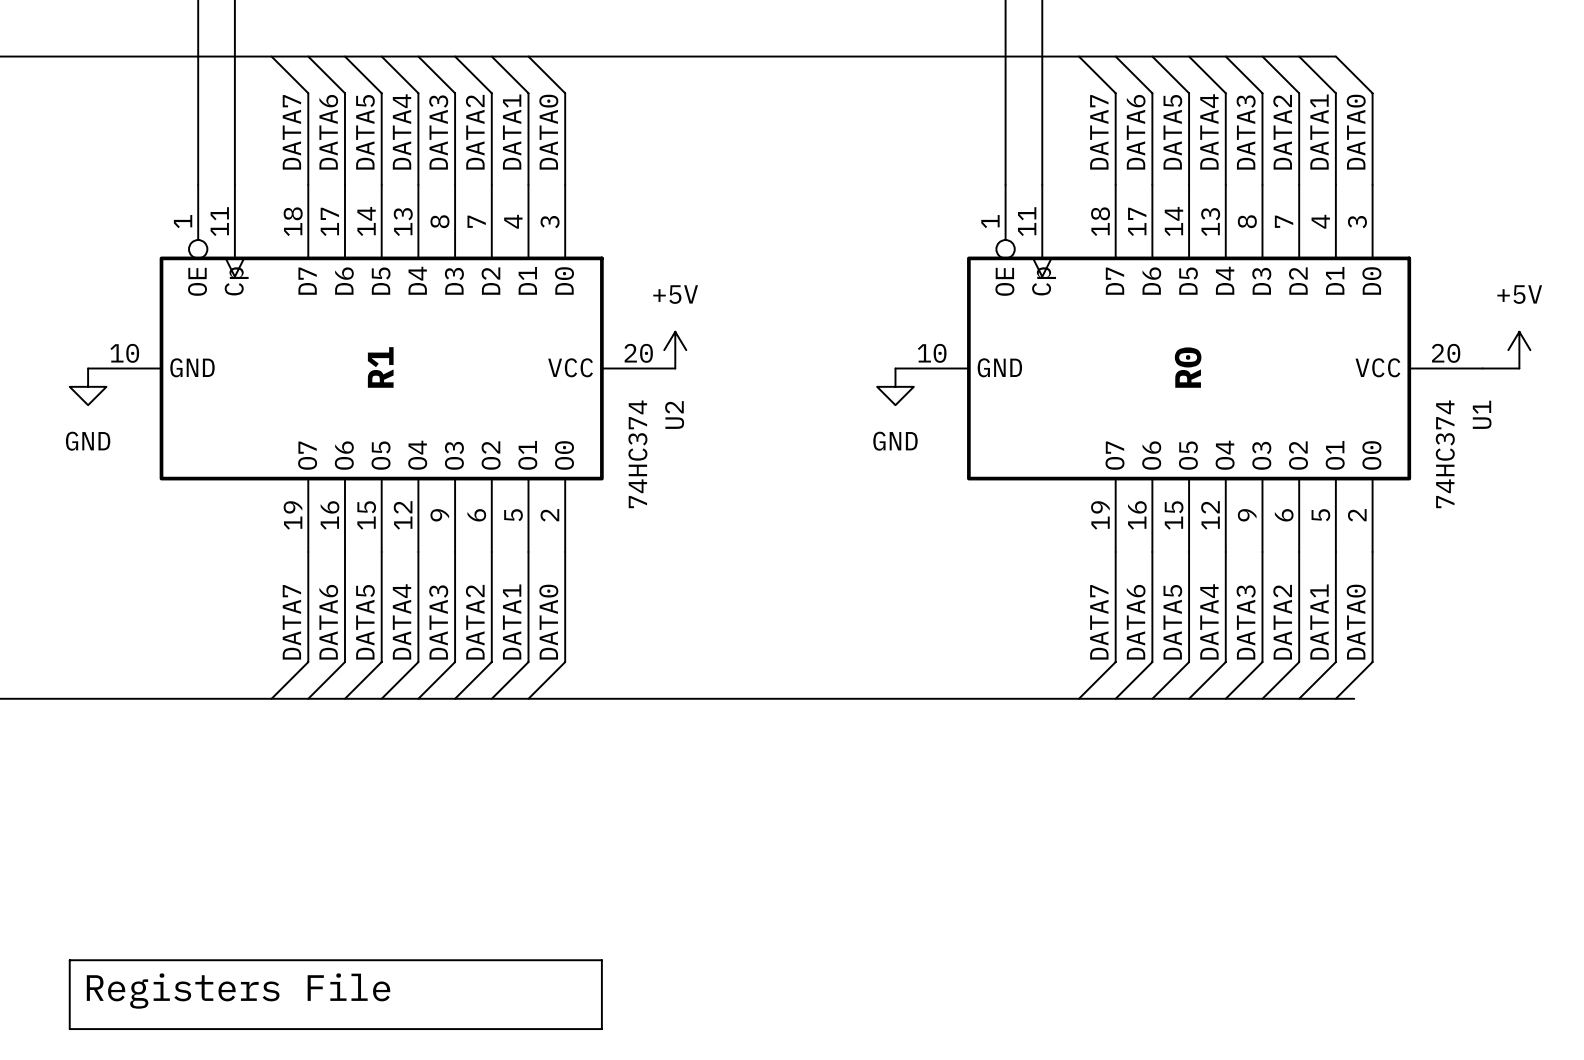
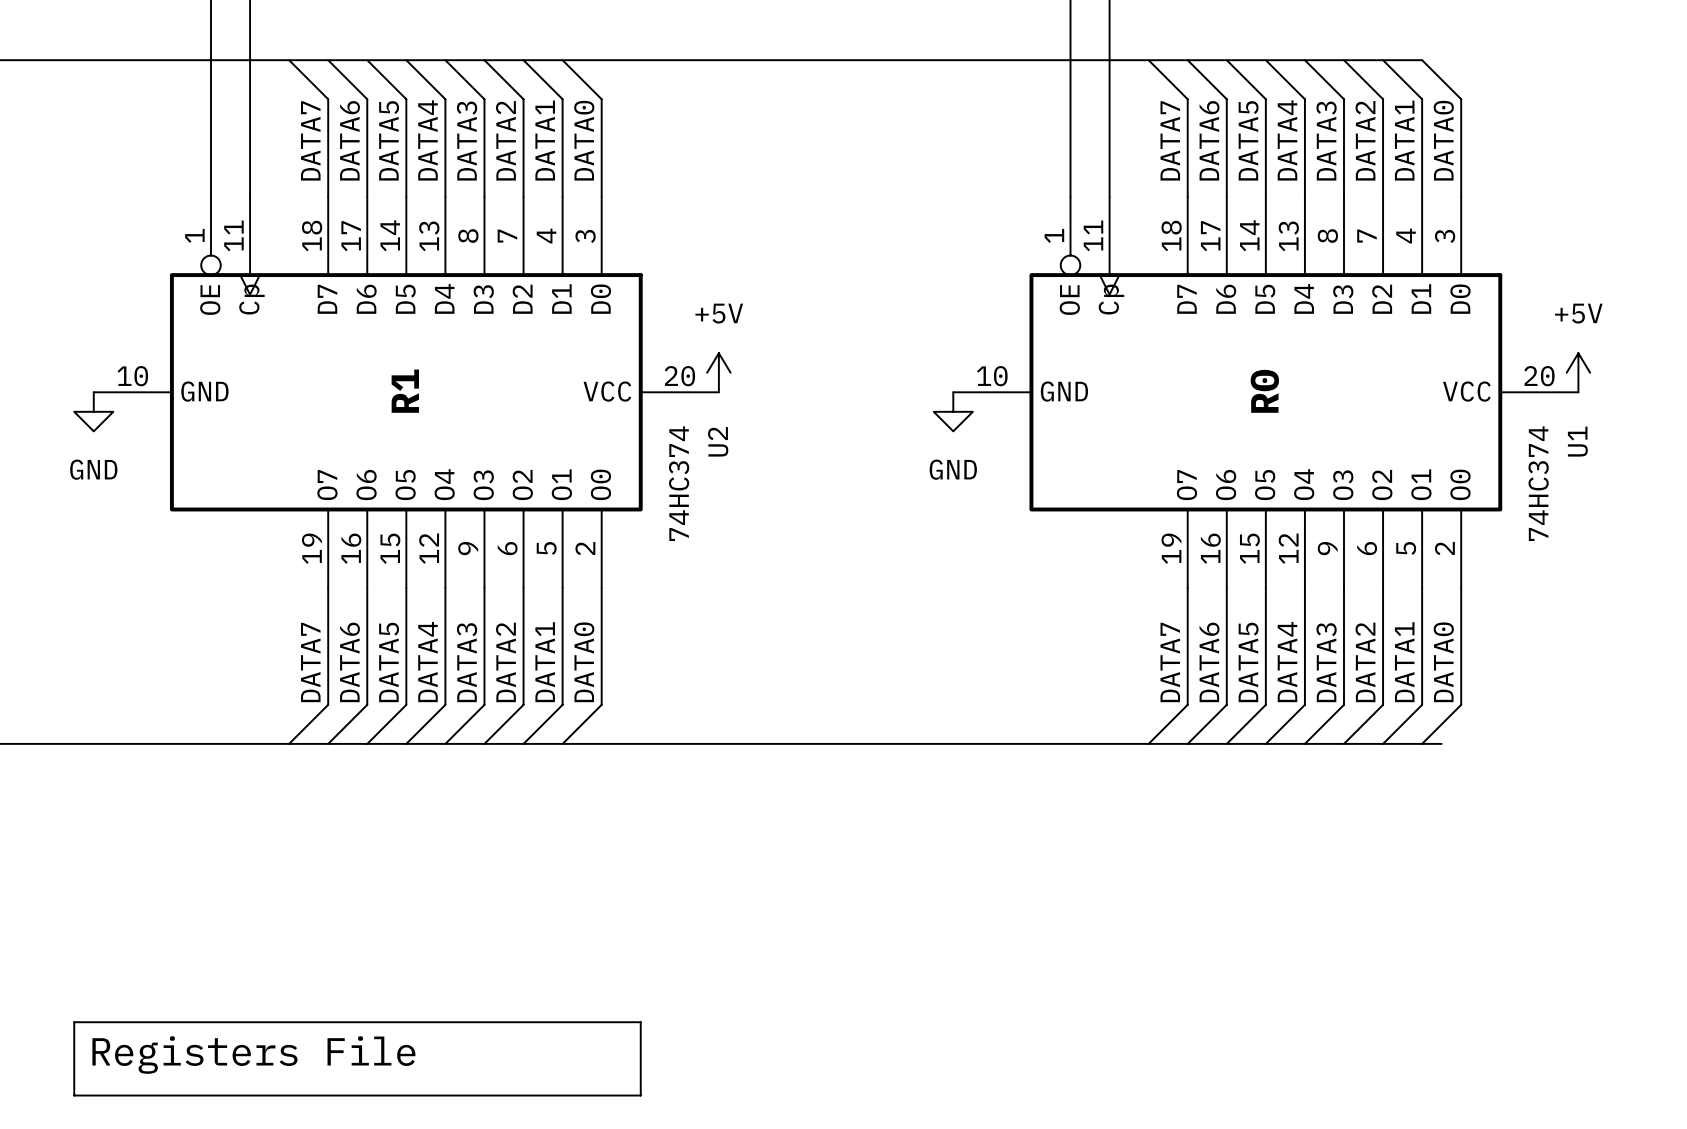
power symbol position: +5V (1519, 350) -> +5V (1578, 372)
wire: (1482, 368) (1519, 368) -> none

